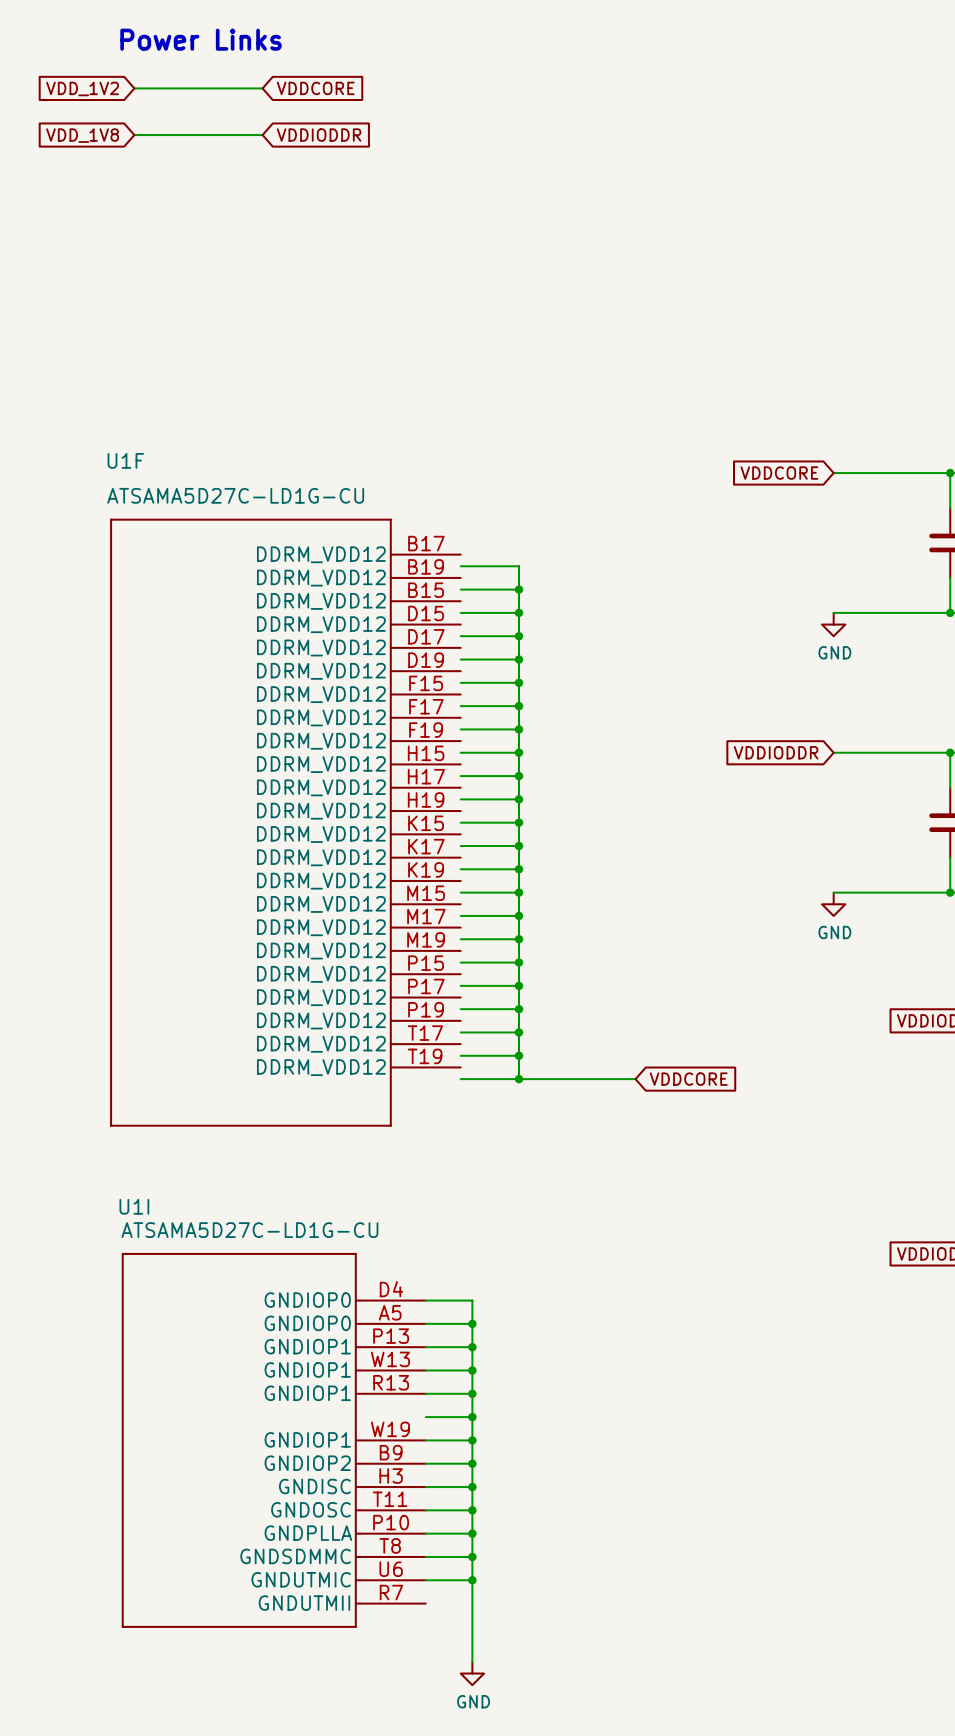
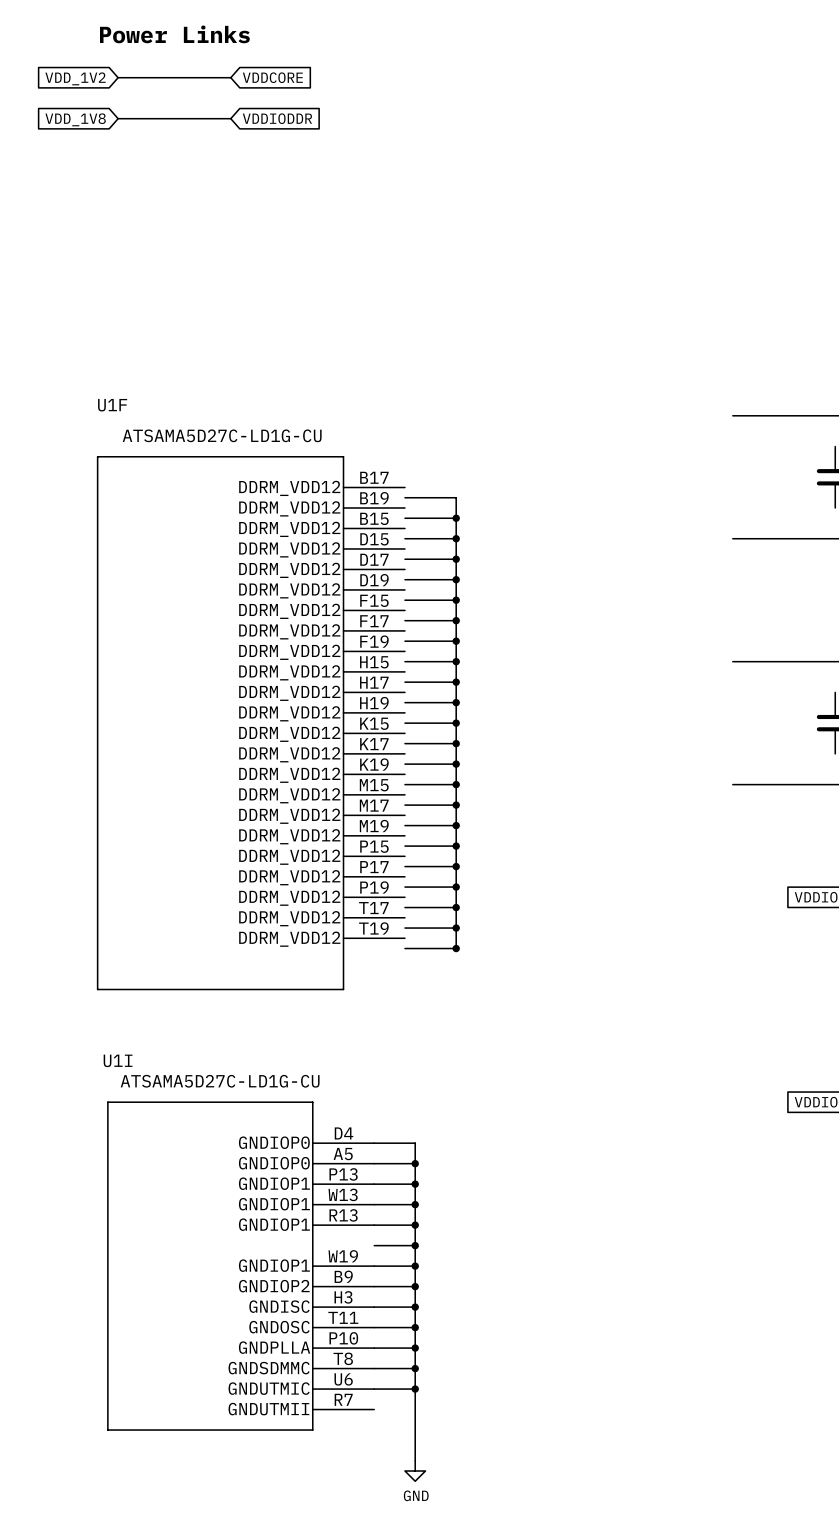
global label: VDDCORE (779, 473) -> none
wire: (950, 473) (950, 508) -> none
junction: (950, 473) -> none
wire: (950, 577) (950, 612) -> none
junction: (950, 612) -> none
power symbol: GND (833, 624) -> none
global label: VDDIODDR (776, 752) -> none
wire: (950, 752) (950, 787) -> none
junction: (950, 752) -> none
wire: (950, 857) (950, 892) -> none
junction: (950, 892) -> none
power symbol: GND (833, 904) -> none
wire: (519, 1079) (635, 1079) -> none
global label: VDDCORE (688, 1079) -> none

